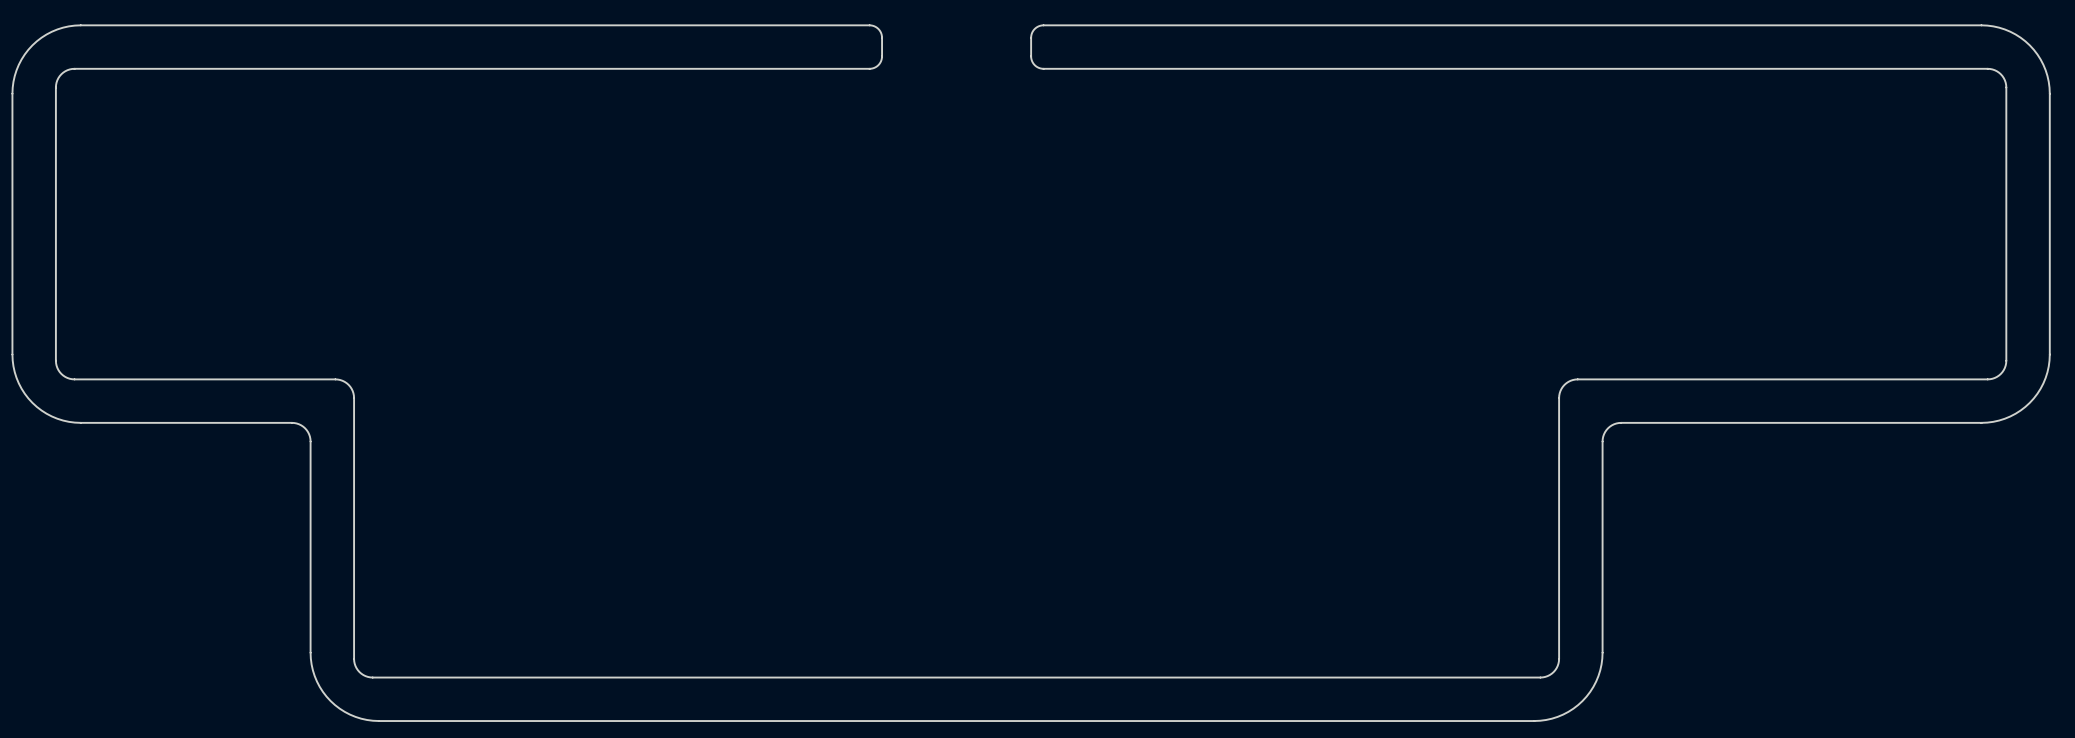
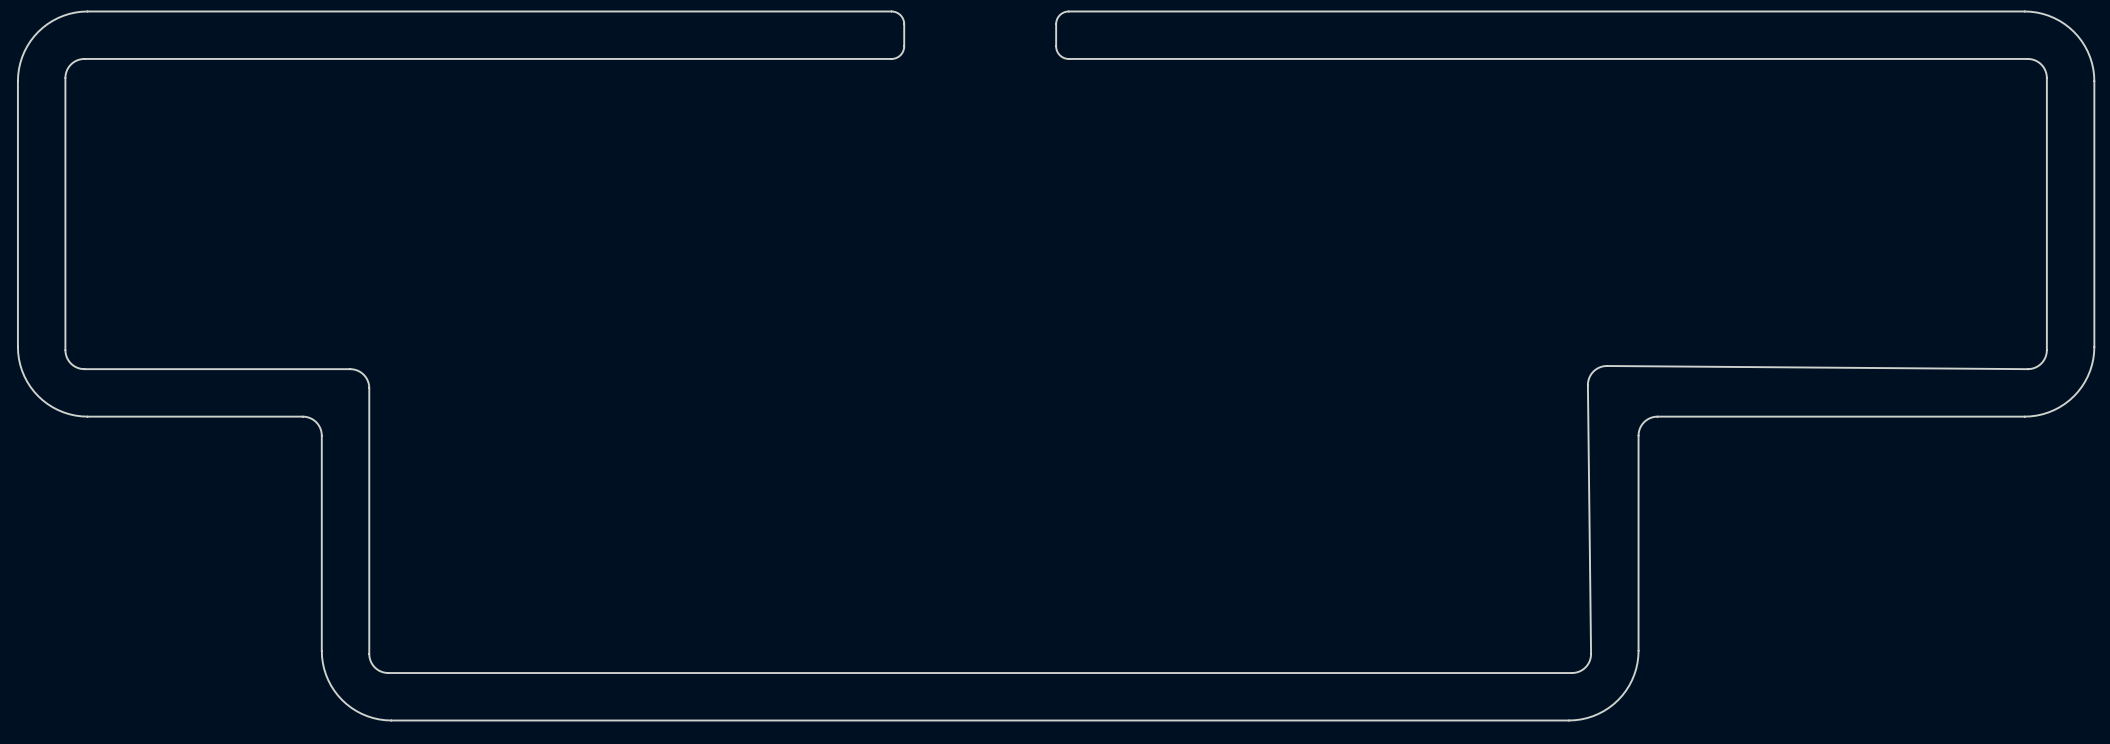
board edge: (882, 56) (878, 65) (869, 68) (67, 70) (58, 78) (55, 87) (57, 367) (63, 375) (74, 379) (335, 379) (348, 384) (354, 398) (354, 661) (361, 673) (372, 677) (1545, 676) (1555, 670) (1559, 658) (1559, 398) -> (904, 43) (901, 54) (891, 58) (77, 60) (67, 68) (65, 77) (66, 357) (72, 365) (84, 369) (350, 369) (363, 374) (369, 388) (369, 656) (373, 665) (383, 672) (1572, 673) (1585, 667) (1590, 656) (1587, 384) (1589, 377) (1595, 369) (1606, 365) (2027, 369) (2039, 365) (2046, 355) (2046, 77) (2042, 66) (2032, 59) (1068, 58) (1058, 54) (1056, 43)
board edge: (1031, 56) (1034, 65) (1043, 68) (1987, 68) (1994, 70) (2002, 76) (2006, 87) (2006, 360) (2004, 367) (1999, 375) (1987, 379) (1577, 379) (1564, 384) (1559, 398) -> none

